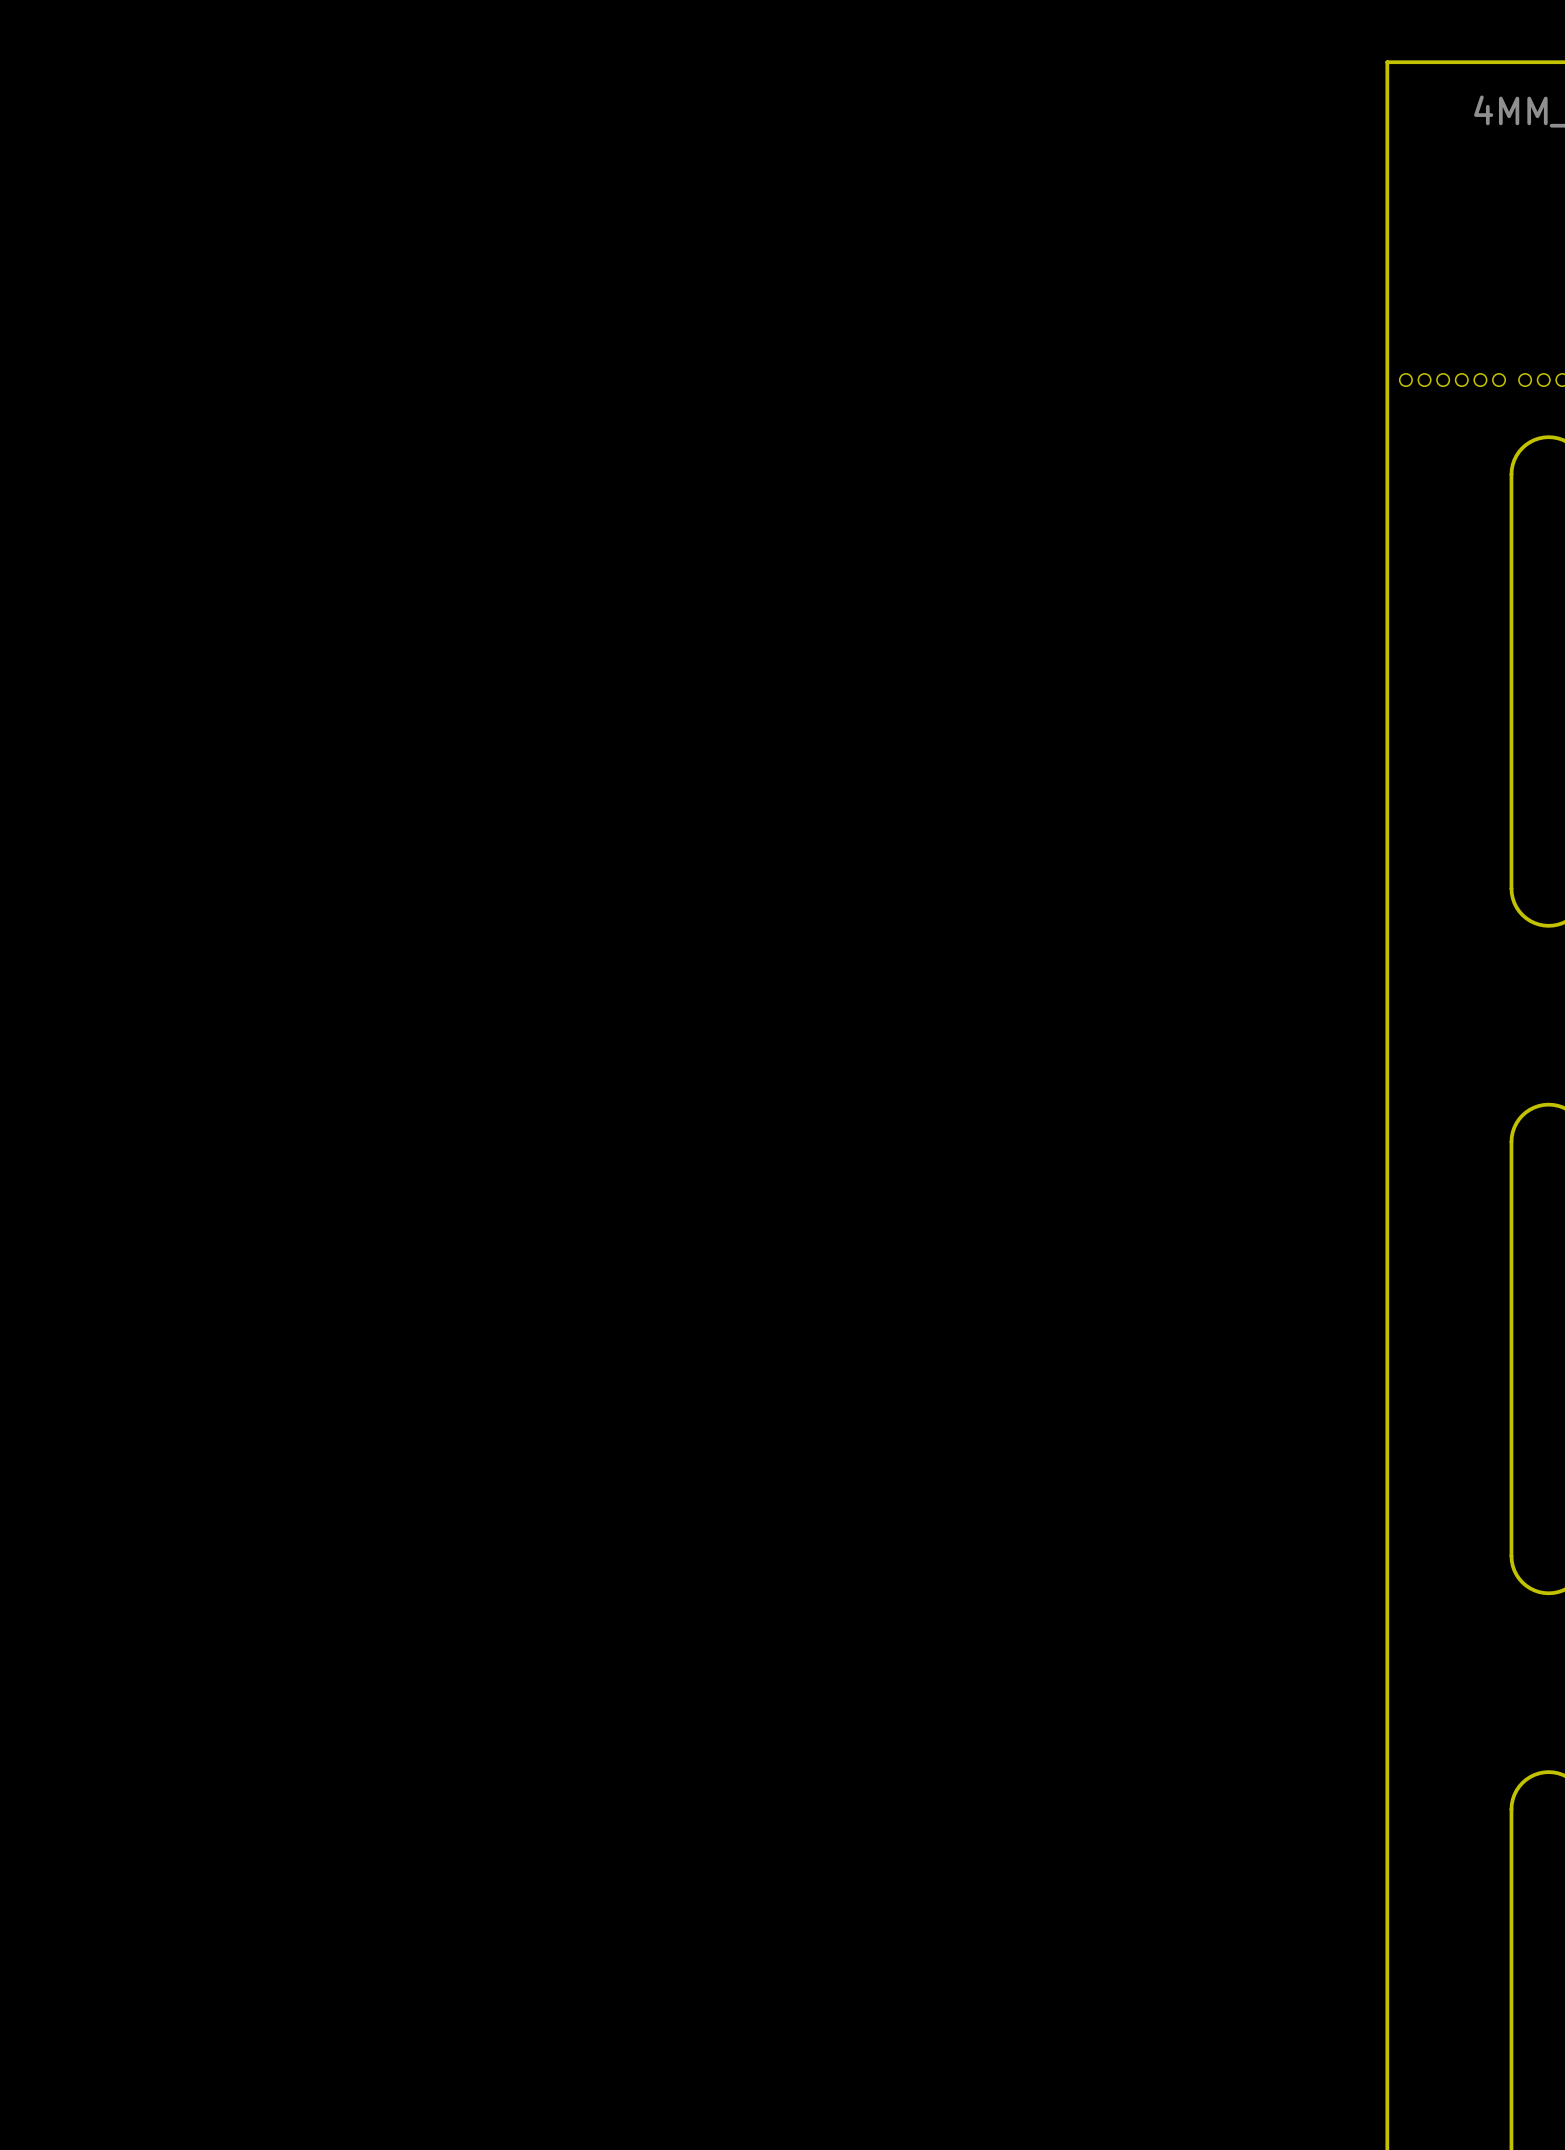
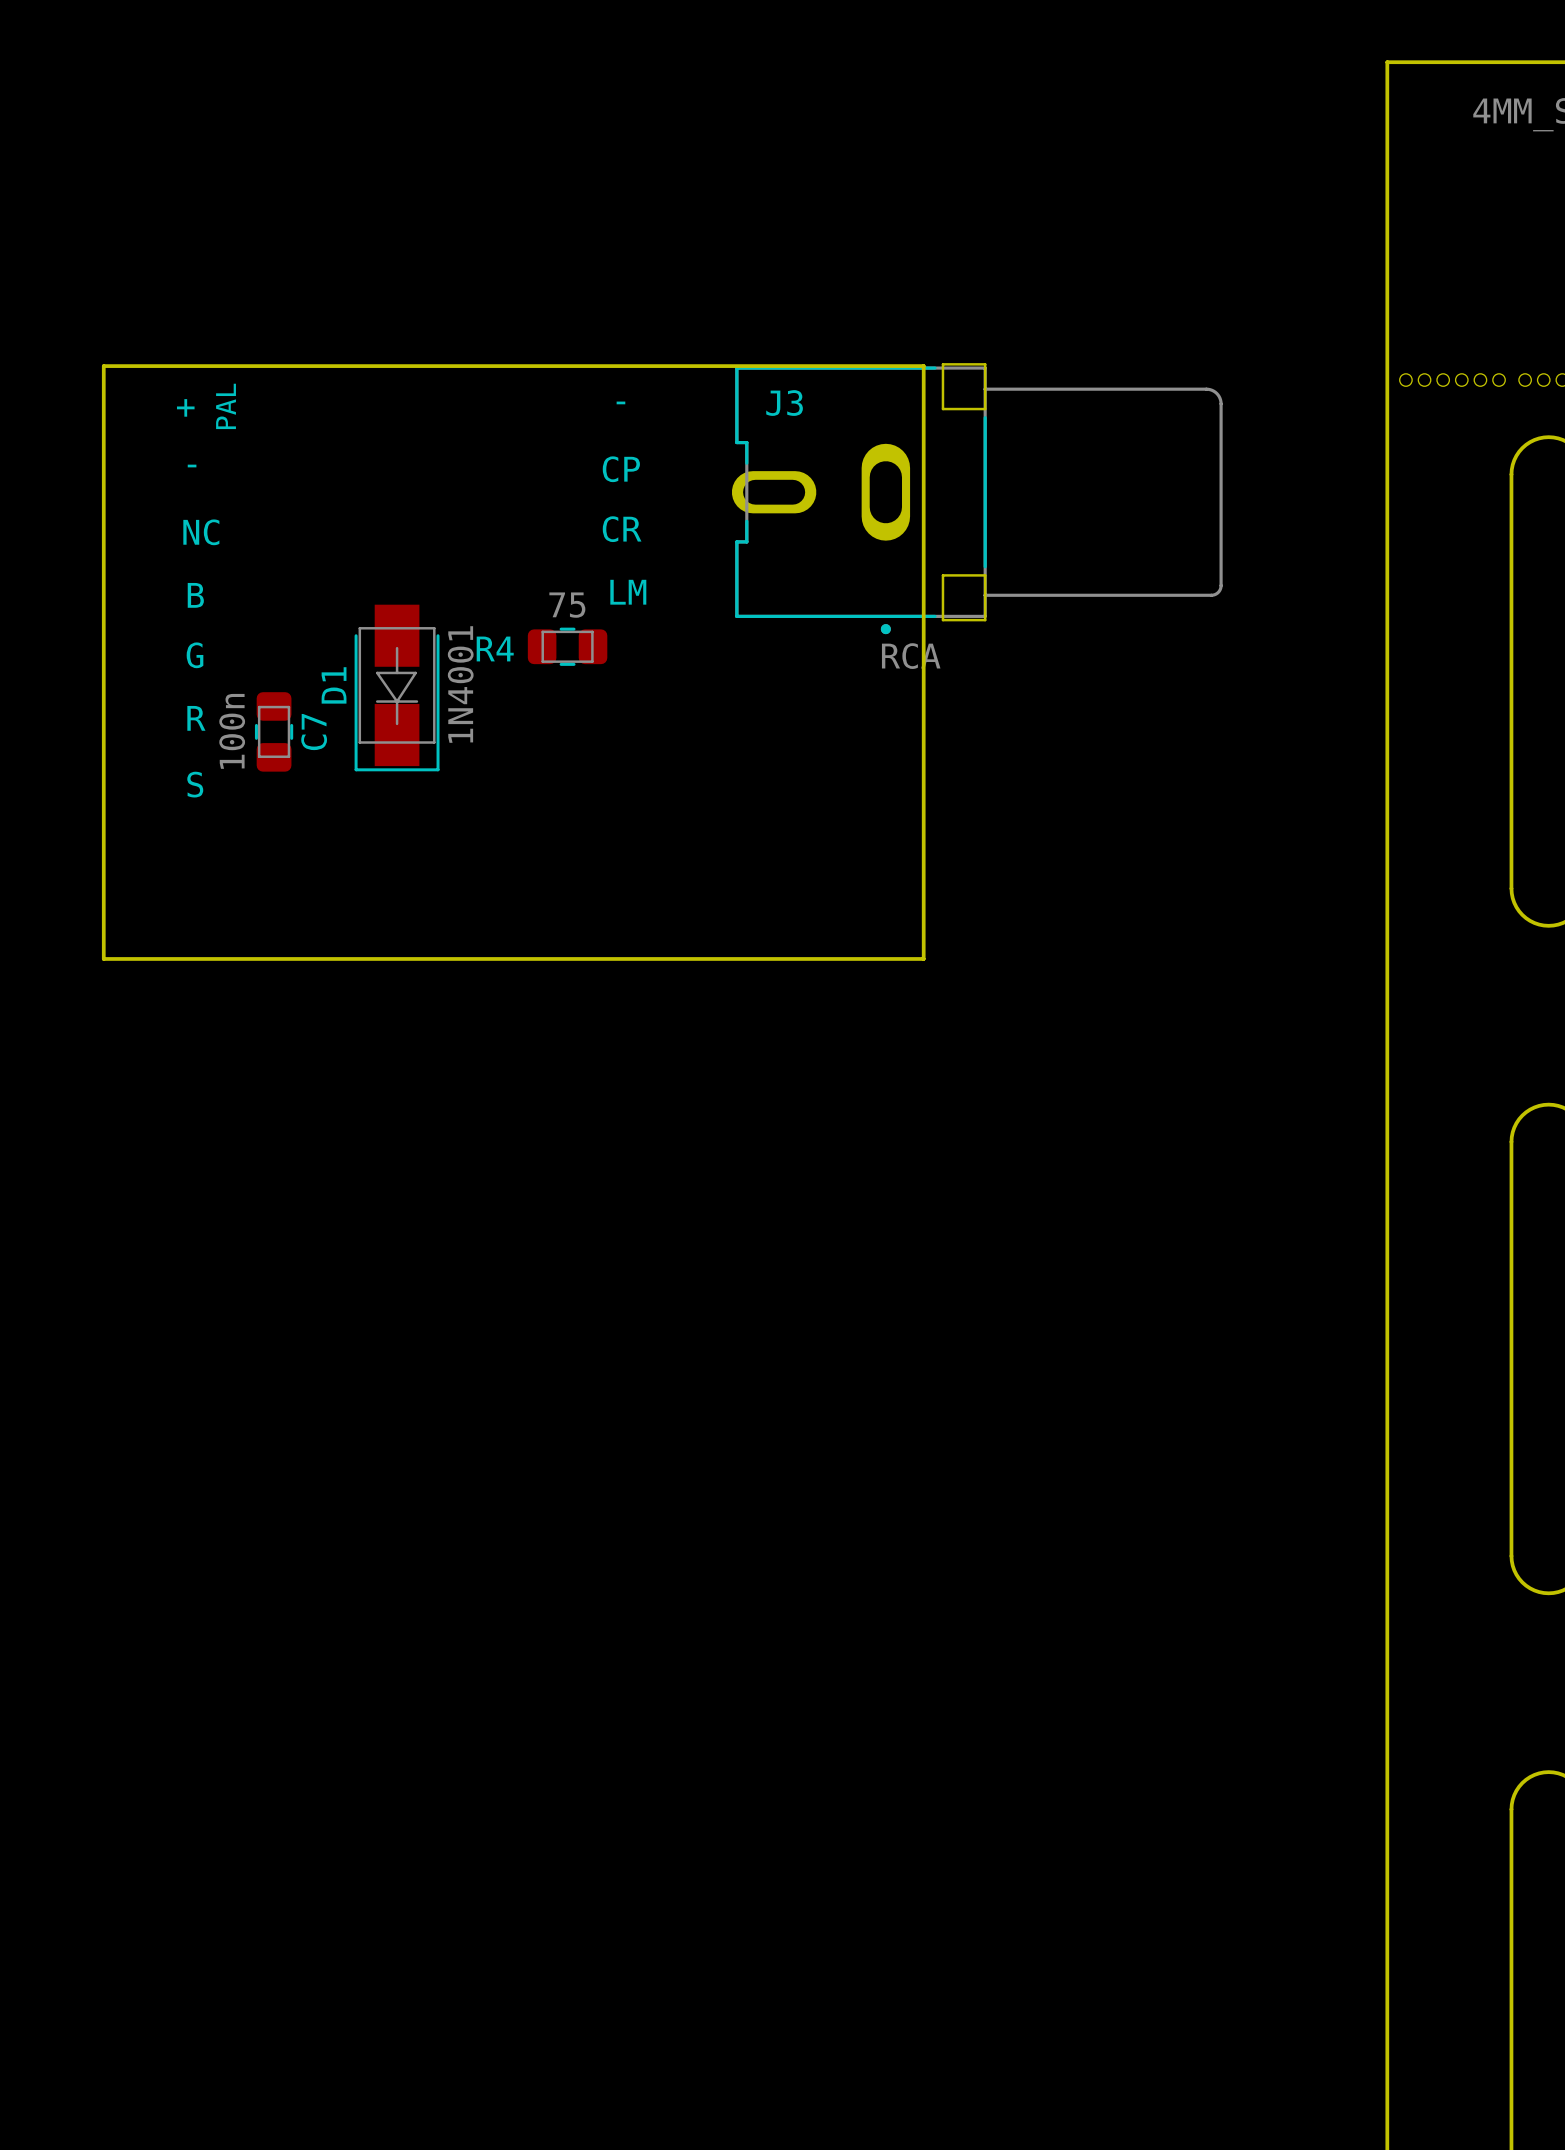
board edge: none -> (103, 366) (103, 958) (923, 958) (923, 366) (103, 366)
text: none -> - (620, 402)
text: none -> PAL (226, 406)
text: none -> + (185, 407)
text: none -> - (192, 466)
text: none -> CP (621, 469)
J3: none -> RCA (977, 498)
text: none -> CR (622, 529)
text: none -> NC (201, 532)
text: none -> LM (628, 592)
text: none -> B (195, 595)
R4: none -> 75 (567, 646)
text: none -> G (195, 655)
D1: none -> 1N4001 (397, 688)
text: none -> R (196, 718)
C7: none -> 100n (274, 731)
text: none -> S (195, 784)

